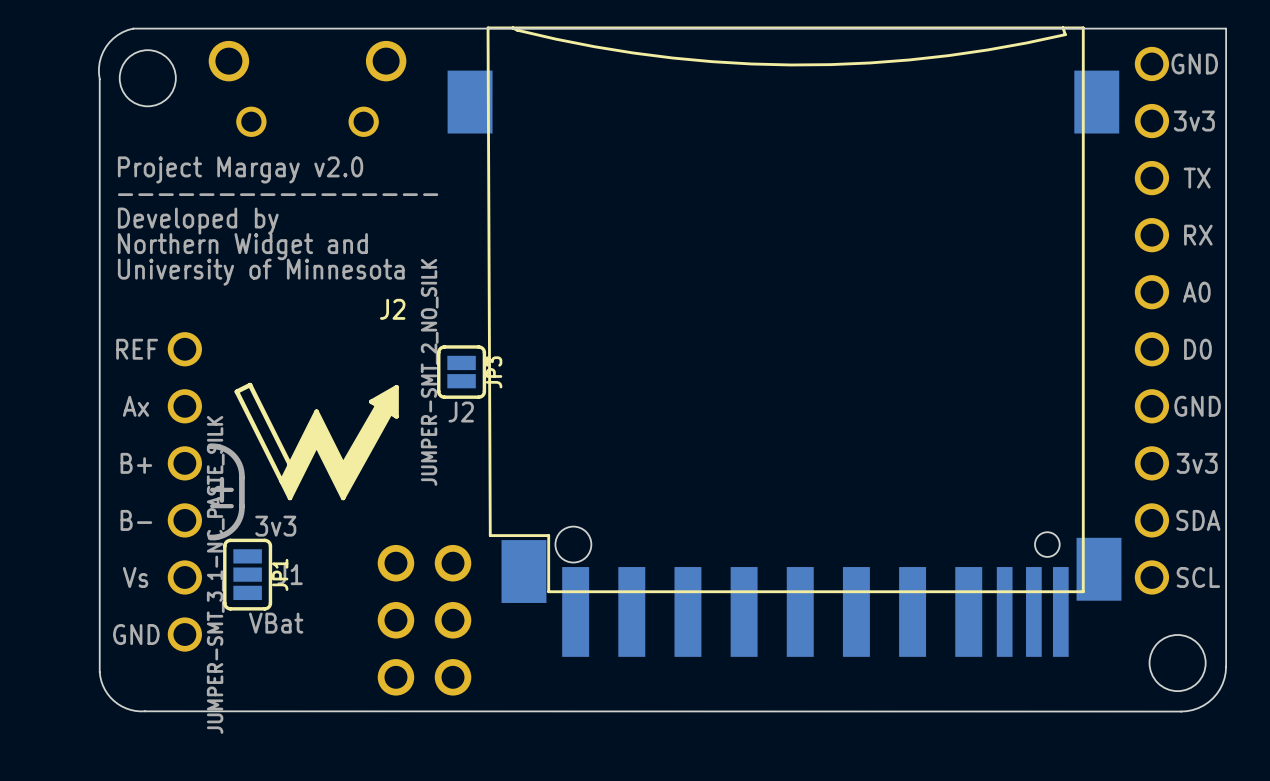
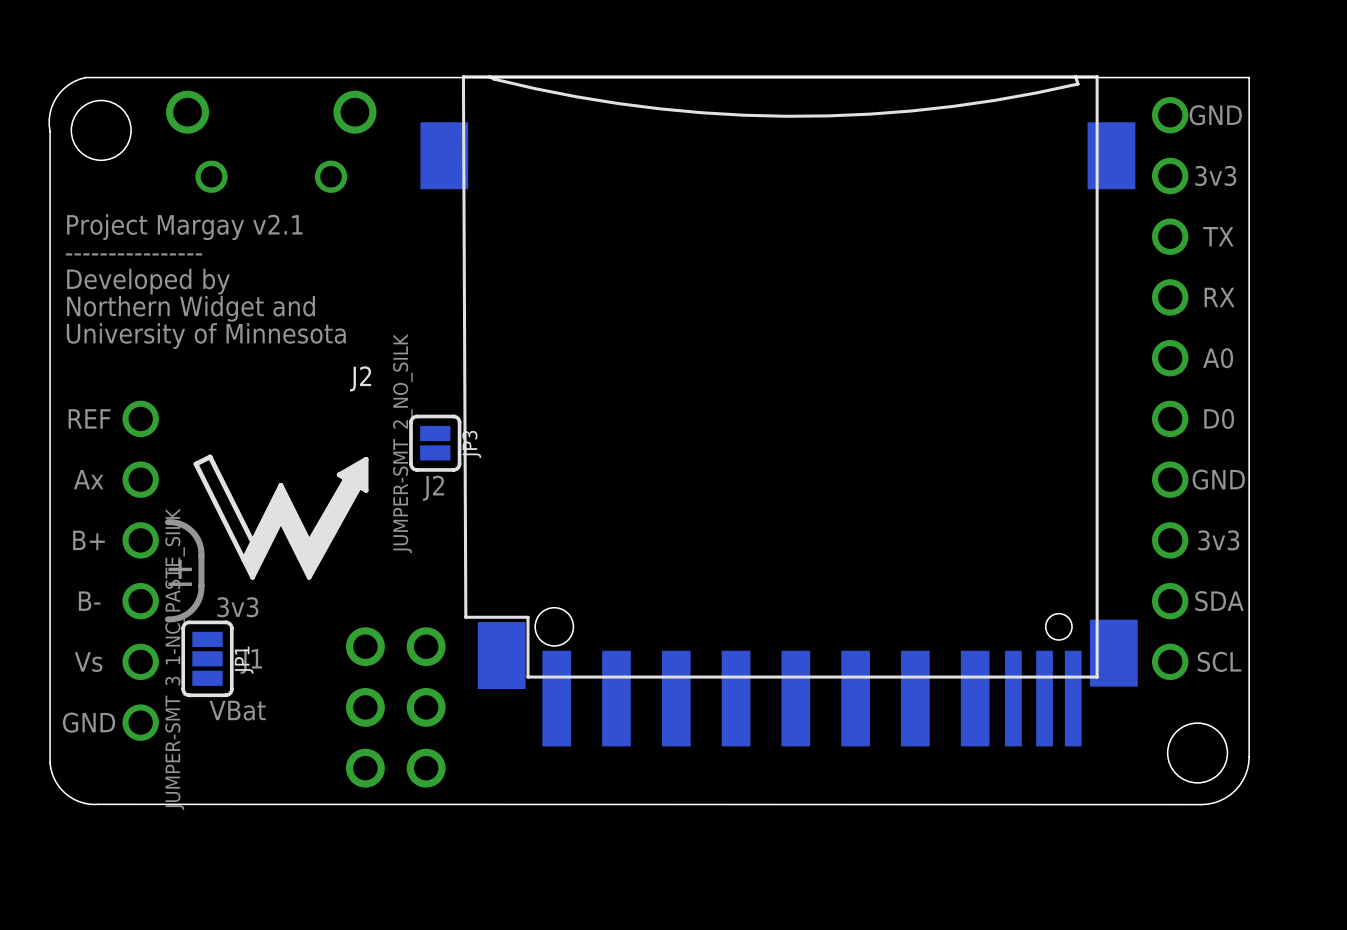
text: Project Margay v2.0 (240, 169) -> Project Margay v2.1 (184, 227)

